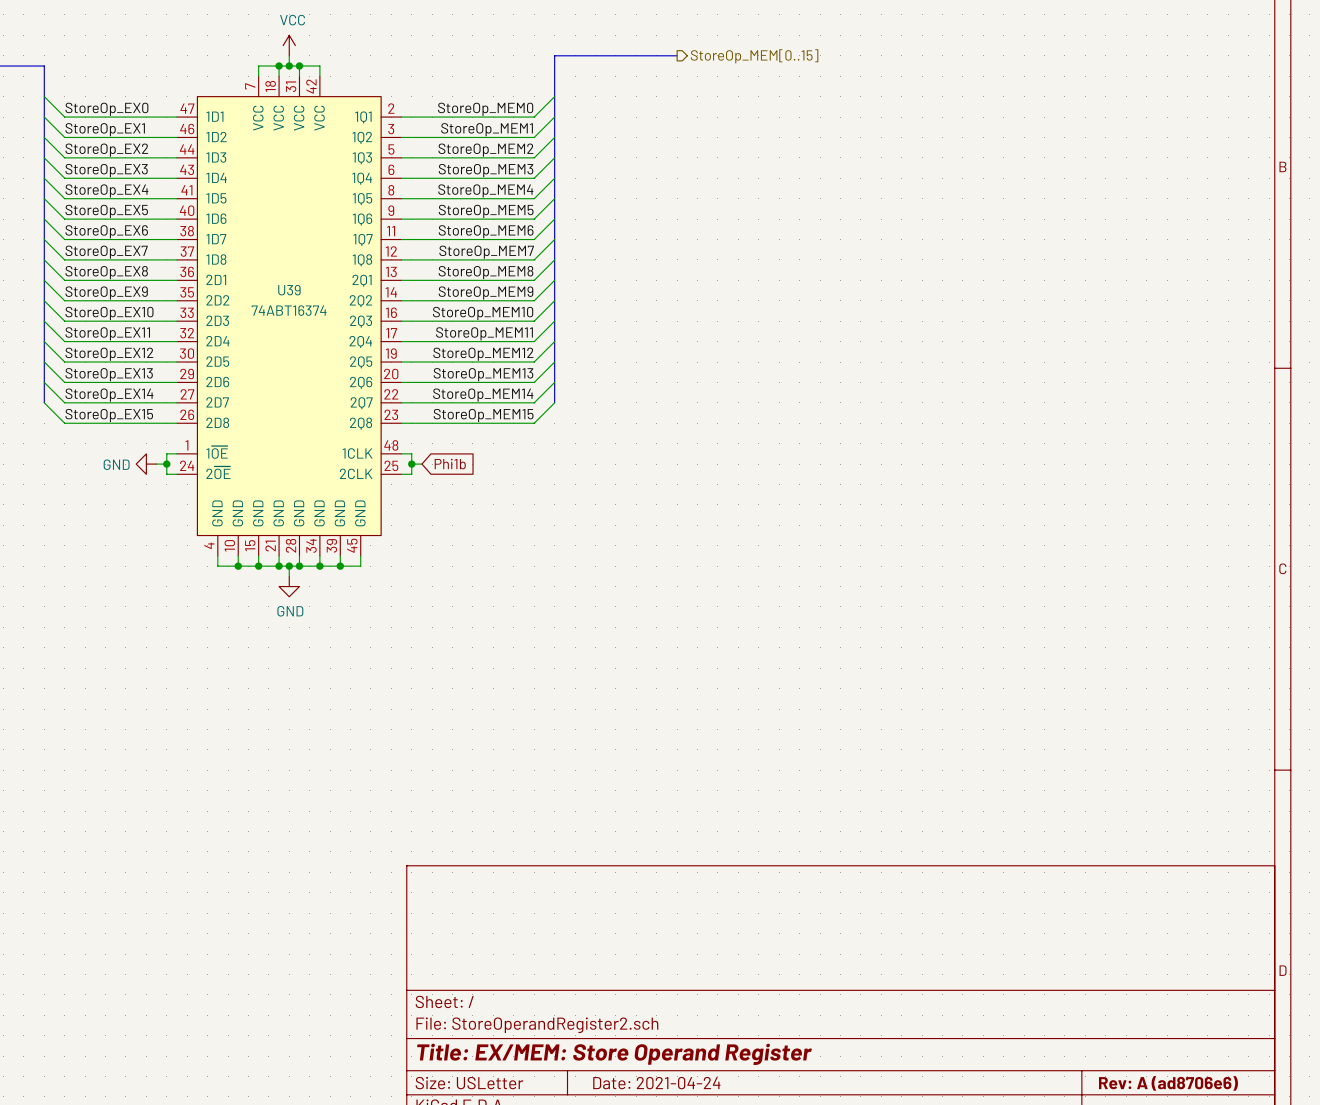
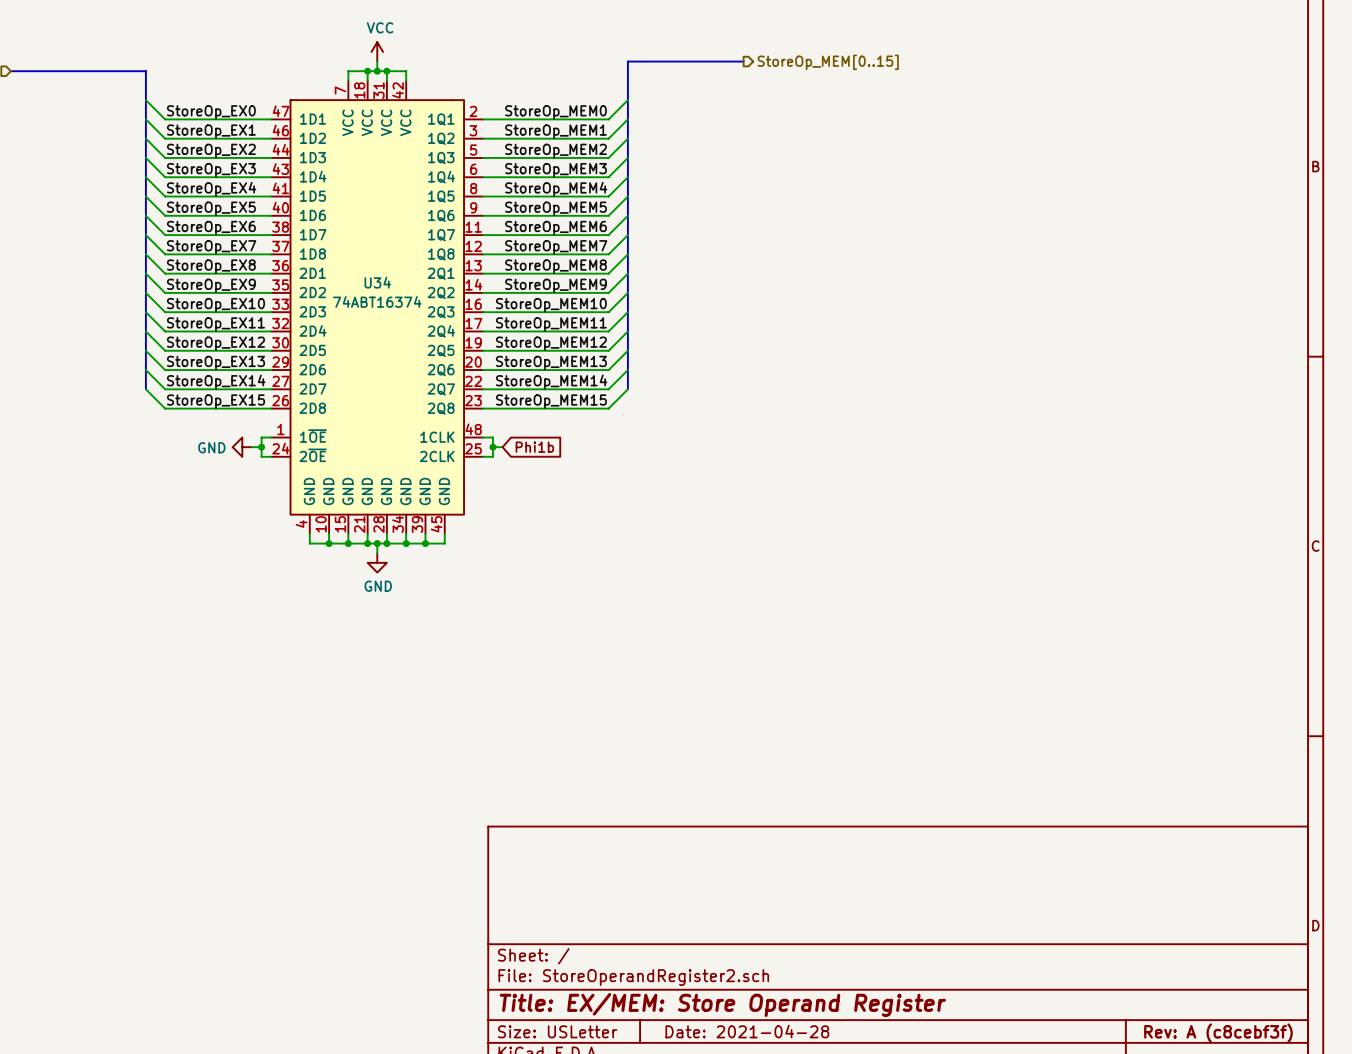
U39 name: U39 (289, 290) -> U34 (377, 282)
title block: Date: 2021-04-24 (656, 1083) -> Date: 2021-04-28 (747, 1031)
title block: Rev: A (ad8706e6) (1168, 1083) -> Rev: A (c8cebf3f) (1218, 1033)

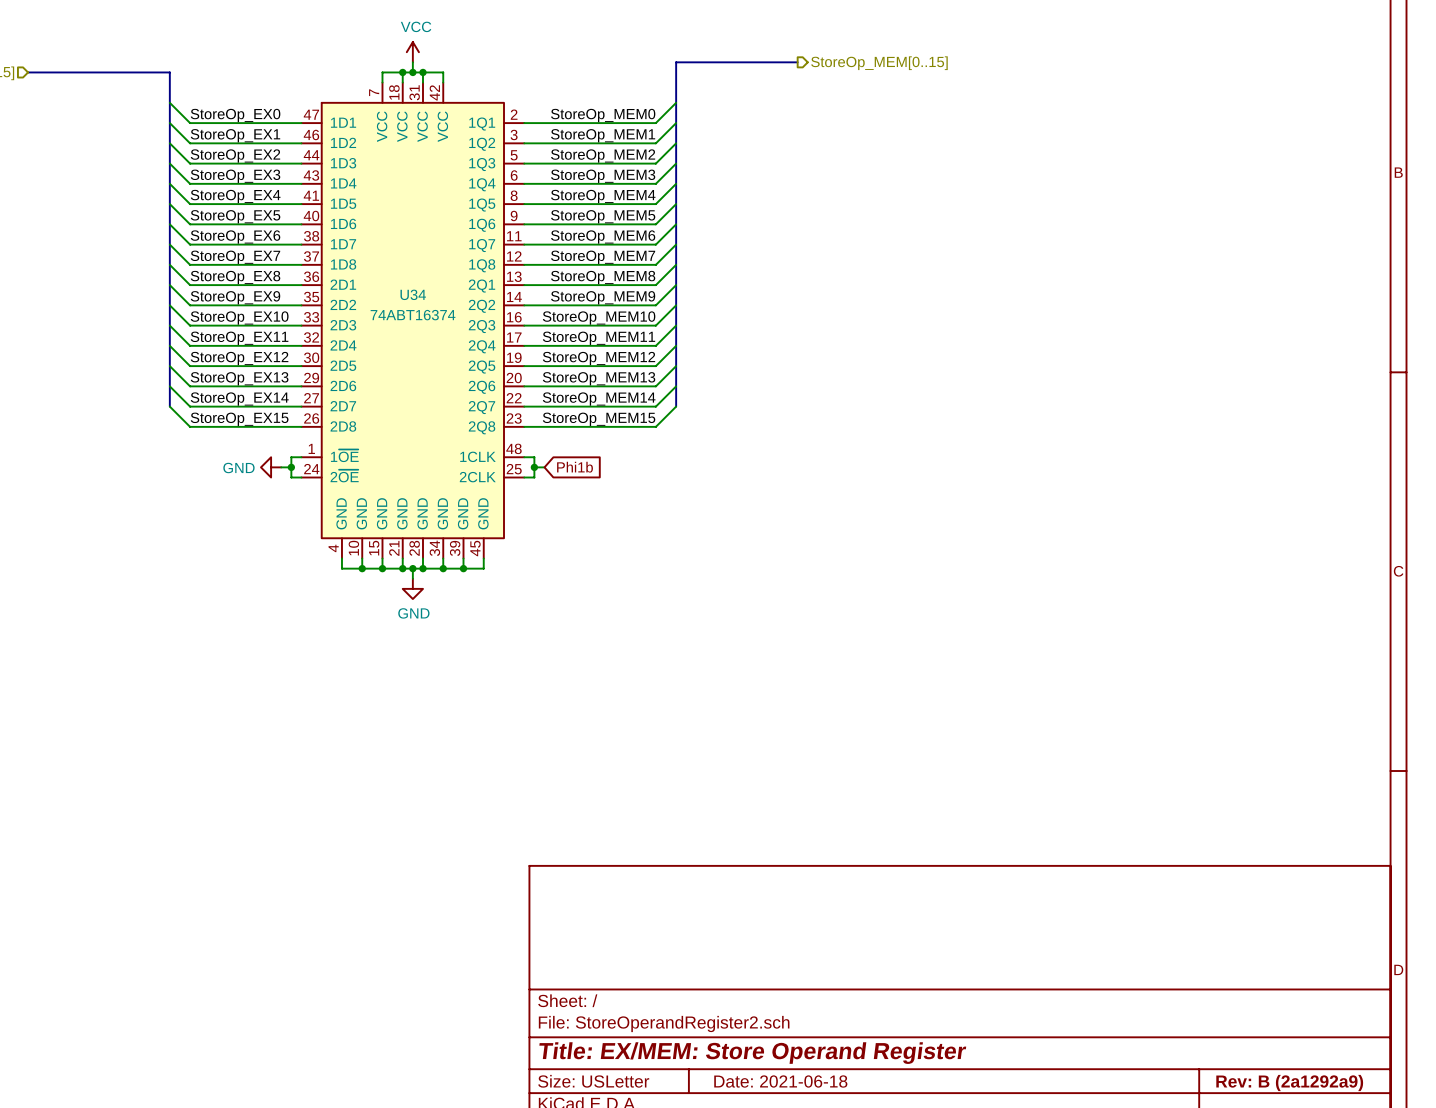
title block: Date: 2021-04-28 (747, 1031) -> Date: 2021-06-18 (780, 1081)
title block: Rev: A (c8cebf3f) (1218, 1033) -> Rev: B (2a1292a9) (1289, 1083)

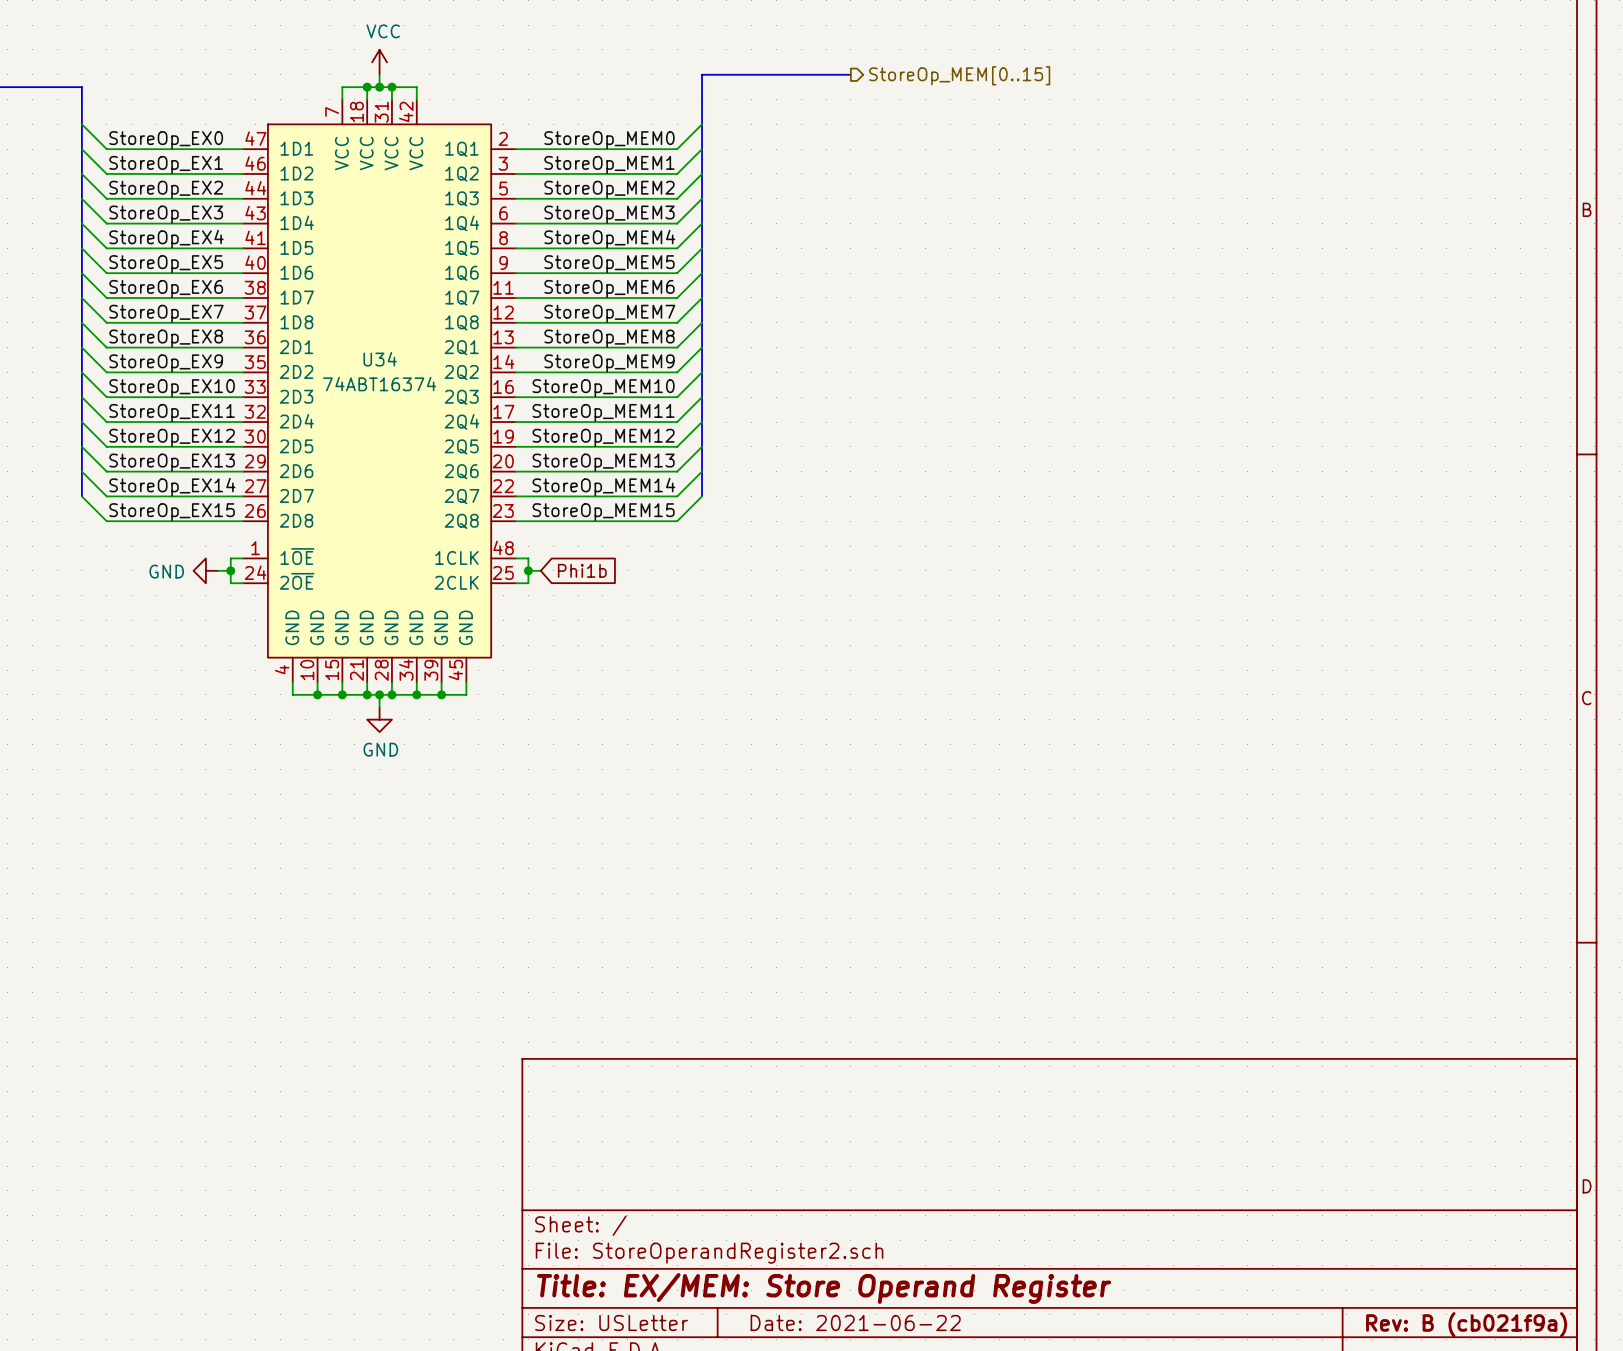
title block: Date: 2021-06-18 (780, 1081) -> Date: 2021-06-22 (855, 1322)
title block: Rev: B (2a1292a9) (1289, 1083) -> Rev: B (cb021f9a) (1466, 1324)

